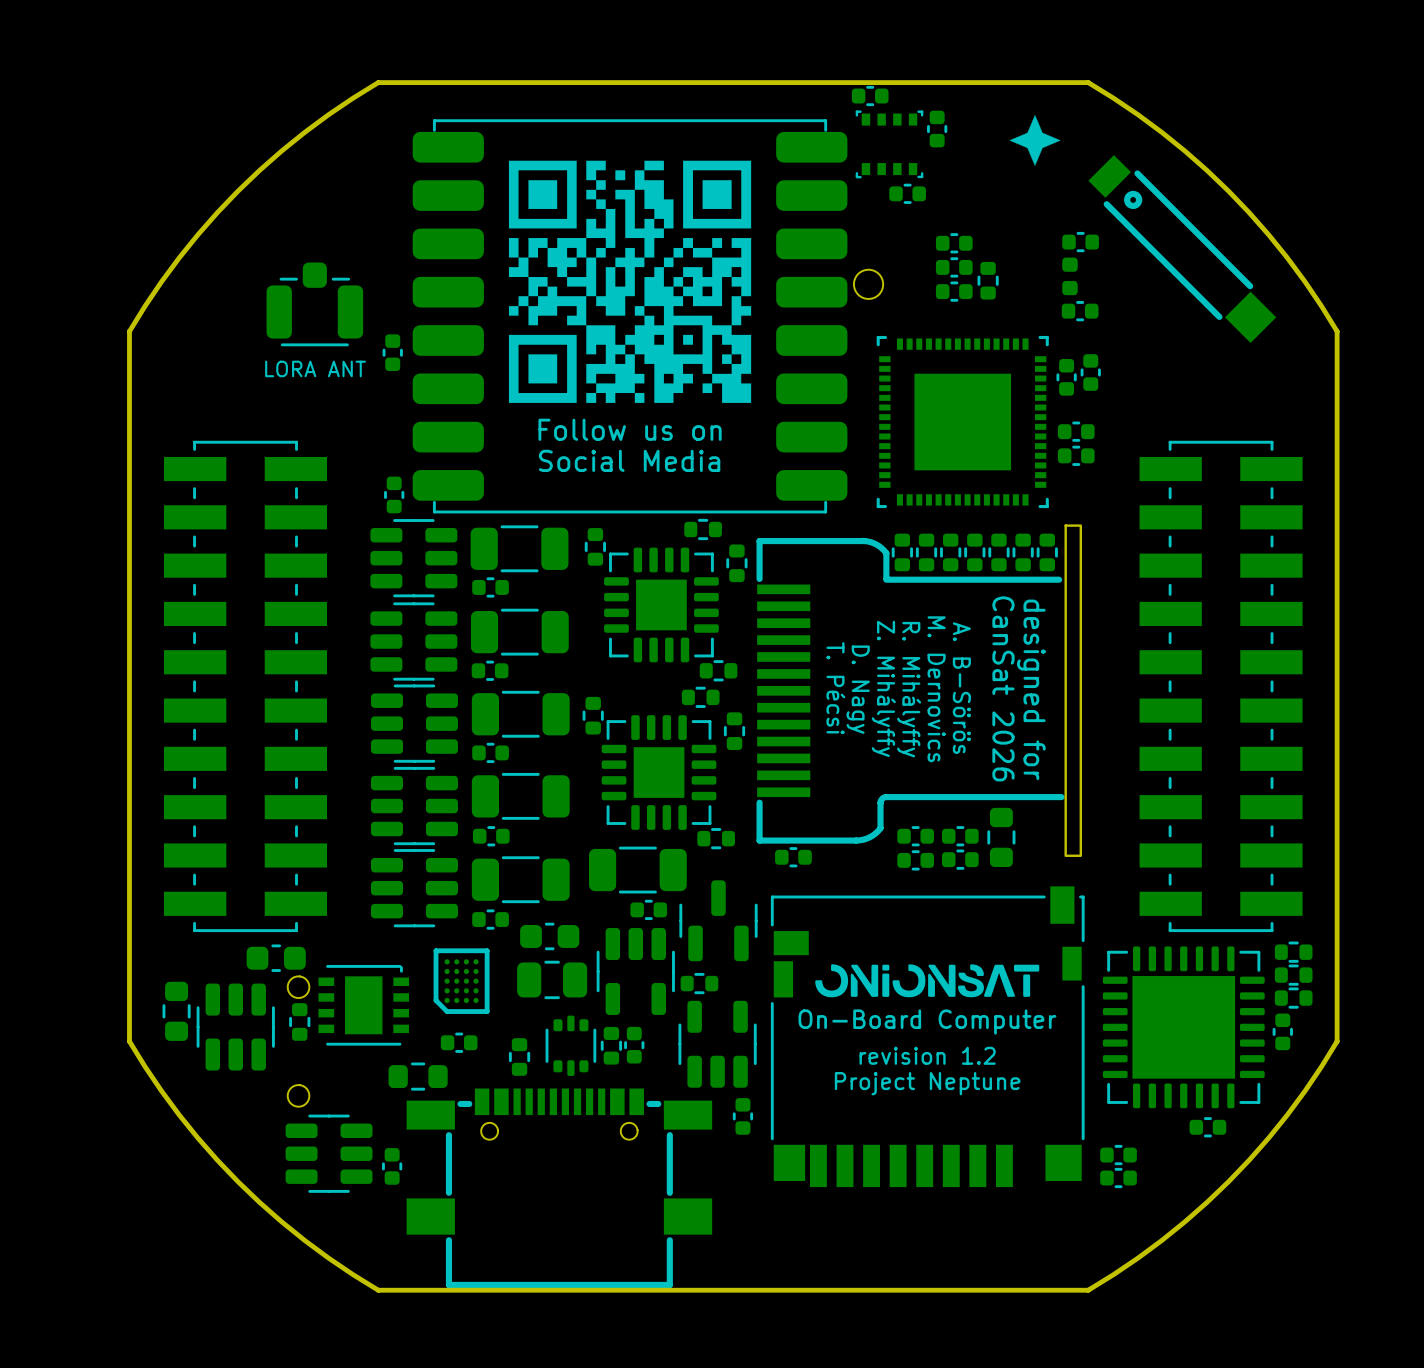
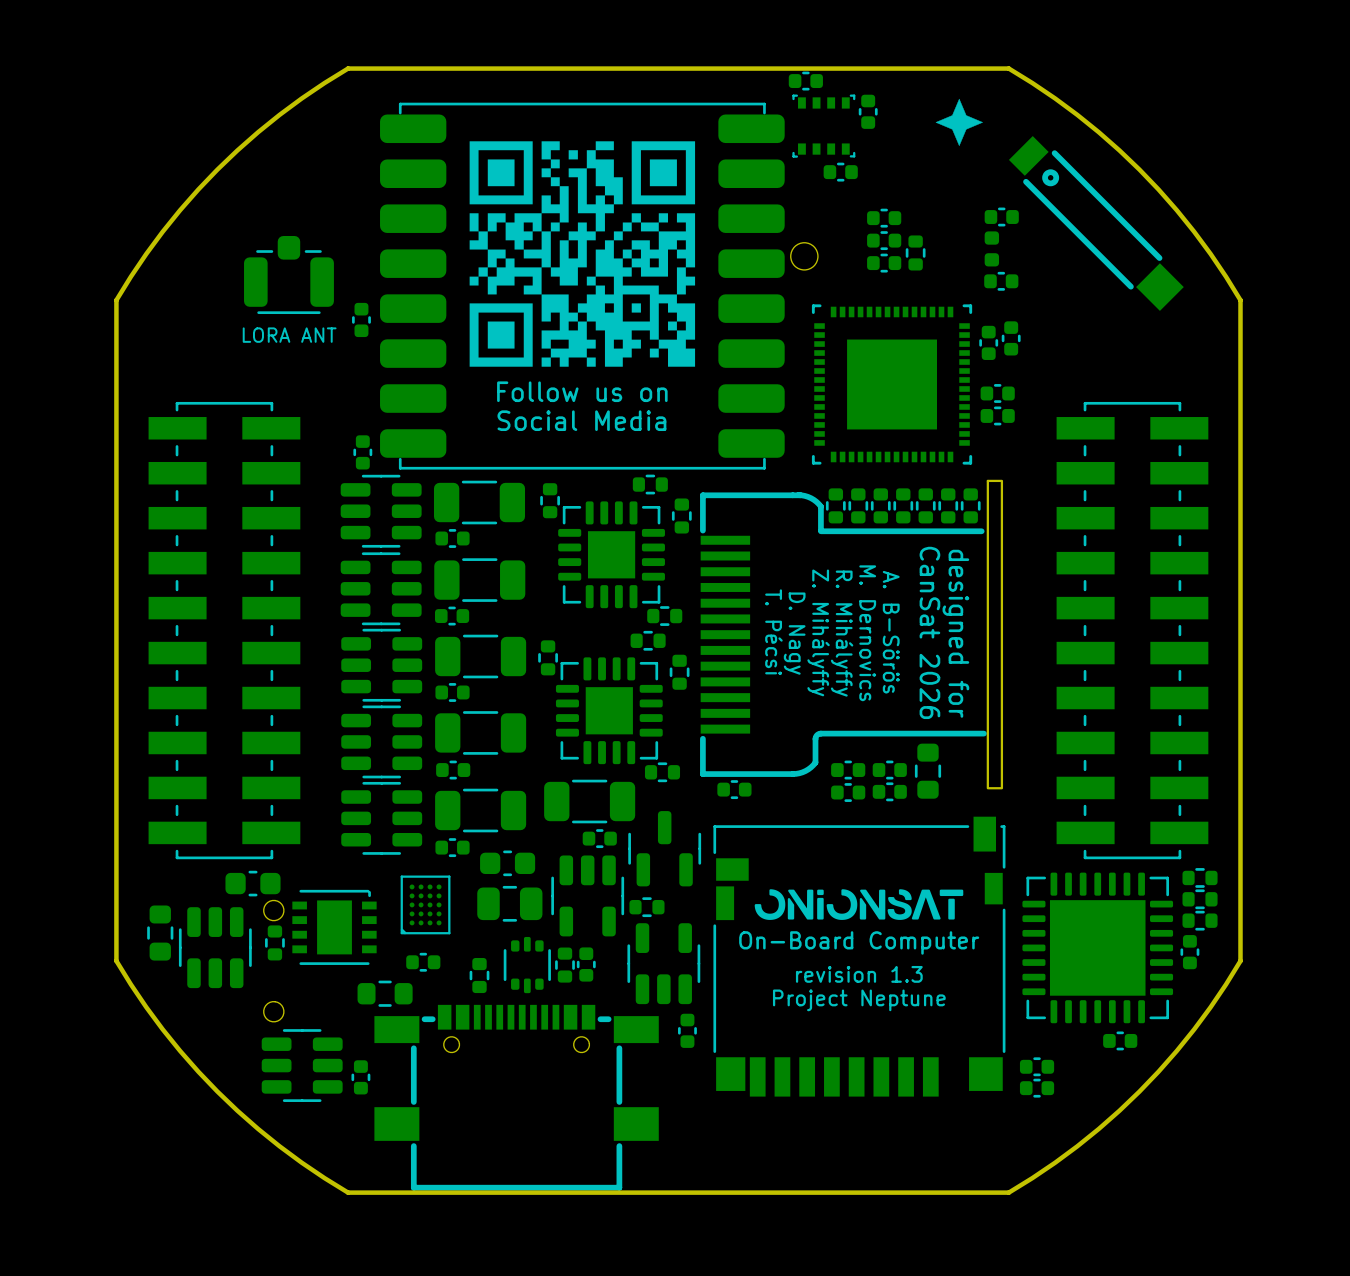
part footprint: [433, 948, 490, 1014] -> [400, 875, 451, 935]
text: revision 1.2 (927, 1055) -> revision 1.3 (859, 974)

